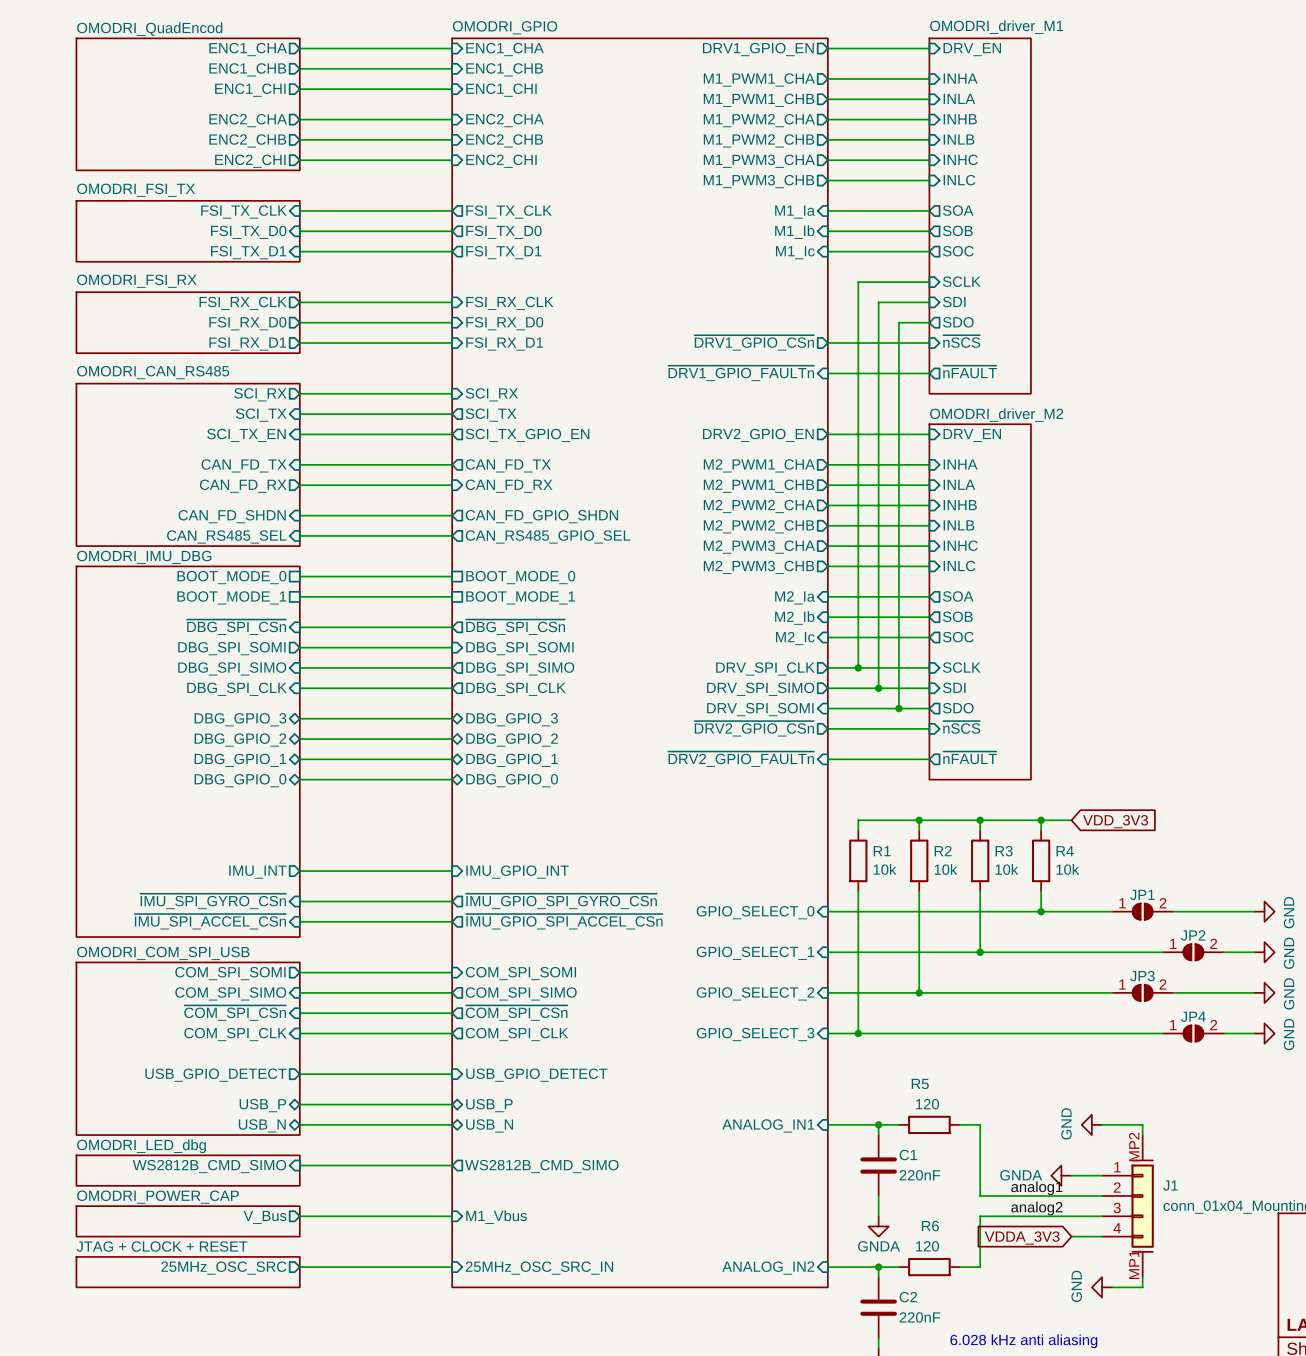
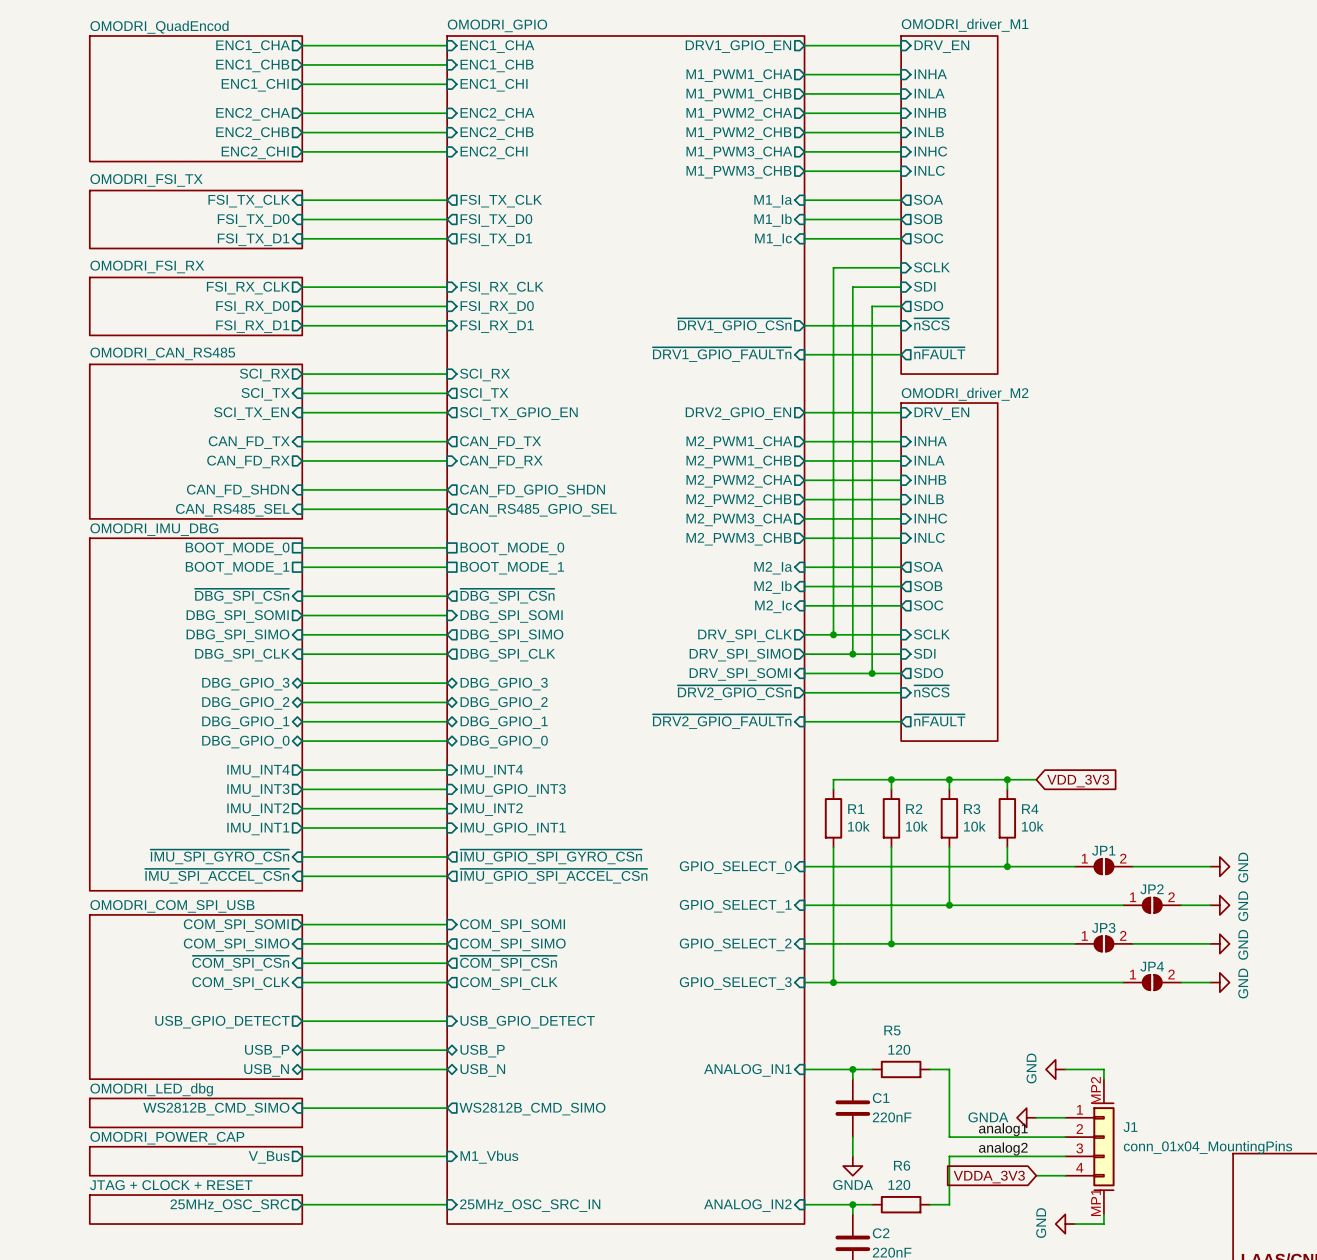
wire: none -> (302, 770) (447, 770)
sheet pin: none -> IMU_INT4 (258, 771)
sheet pin: none -> IMU_INT4 (491, 771)
wire: none -> (302, 789) (447, 789)
sheet pin: none -> IMU_INT3 (258, 790)
sheet pin: none -> IMU_GPIO_INT3 (513, 790)
wire: none -> (302, 808) (447, 808)
sheet pin: none -> IMU_INT2 (258, 809)
sheet pin: none -> IMU_INT2 (491, 809)
sheet pin: IMU_INT (257, 872) -> IMU_INT1 (258, 829)
sheet pin: IMU_GPIO_INT (517, 872) -> IMU_GPIO_INT1 (513, 828)

